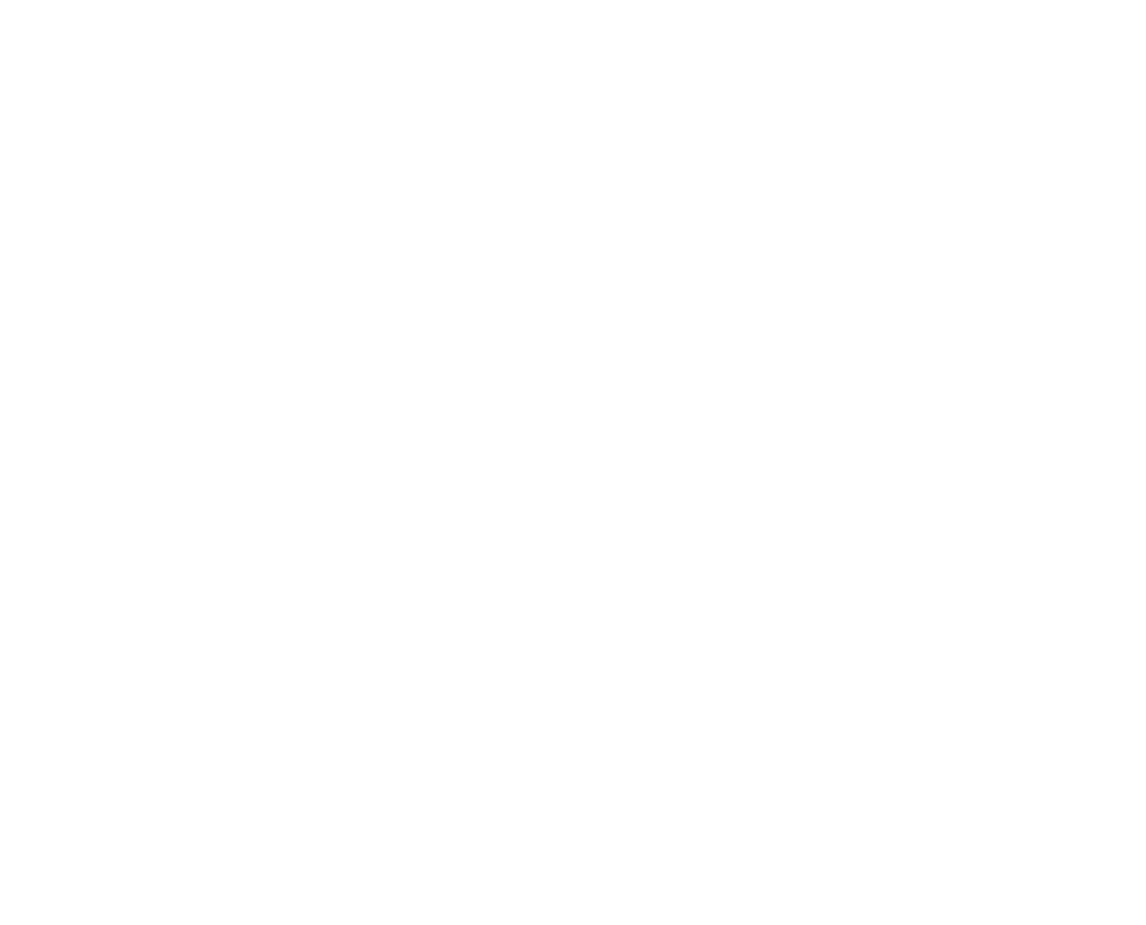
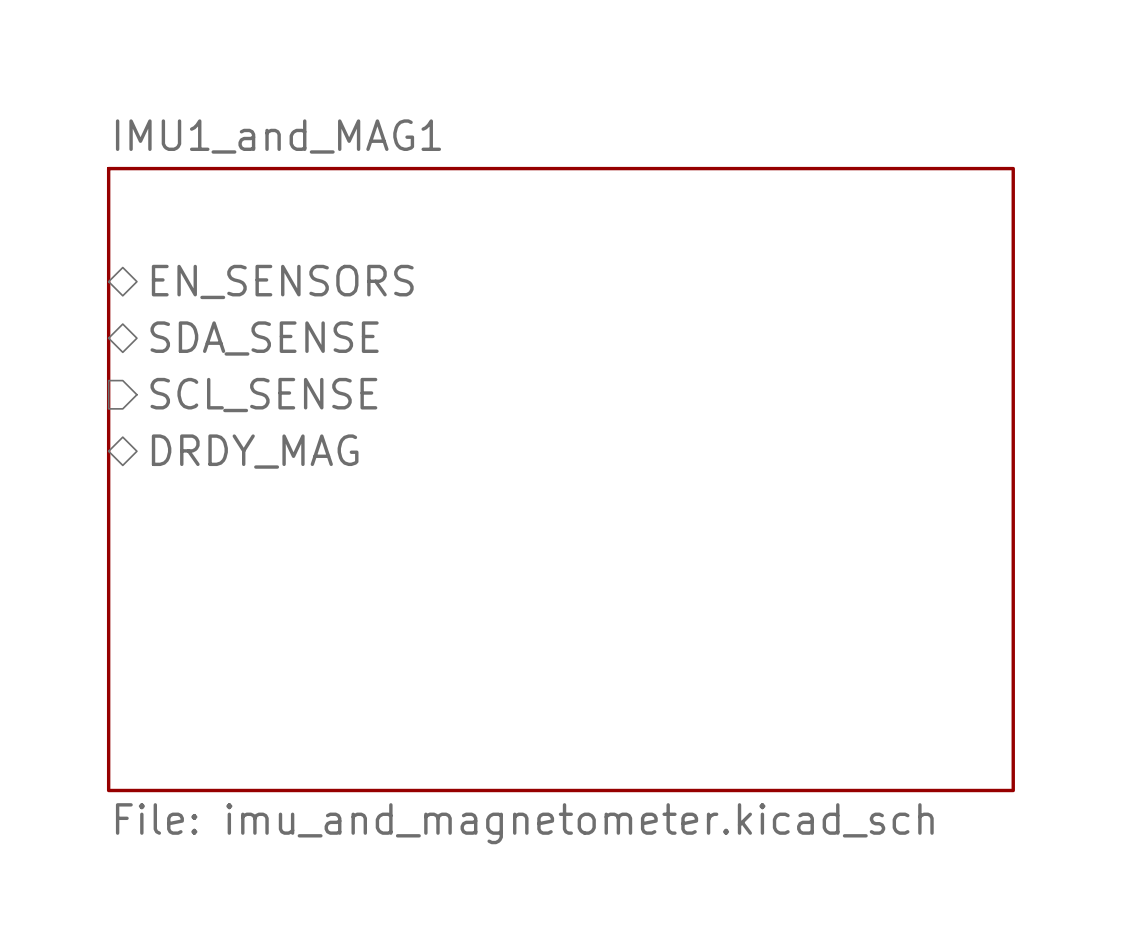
sheet pin: none -> EN_SENSORS (282, 281)
sheet pin: none -> SDA_SENSE (264, 338)
sheet pin: none -> SCL_SENSE (263, 395)
sheet pin: none -> DRDY_MAG (255, 451)
sheet IMU1_and_MAG1: none -> File: imu_and_magnetometer.kicad_sch (560, 479)

